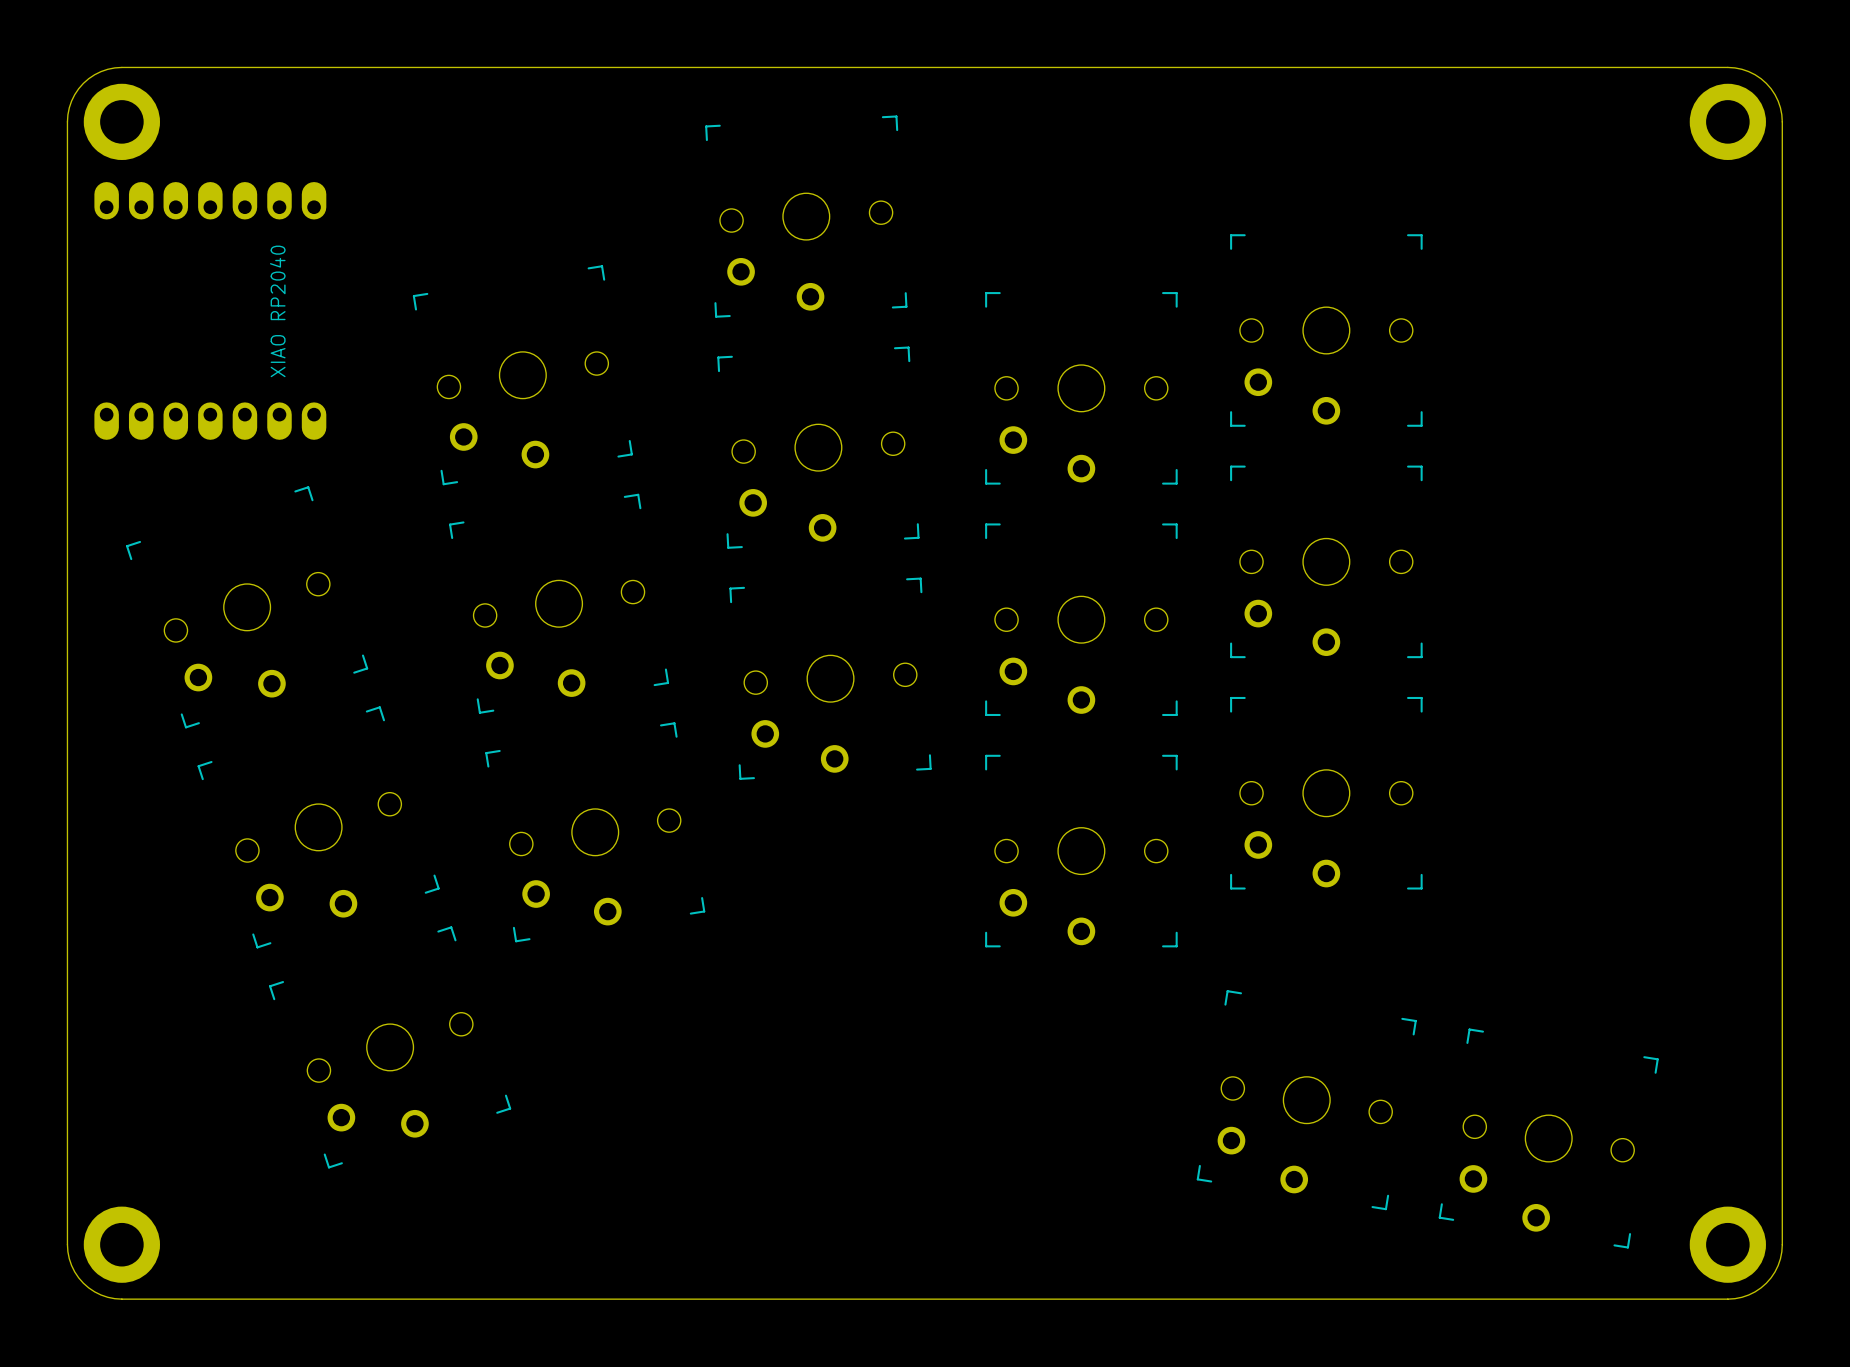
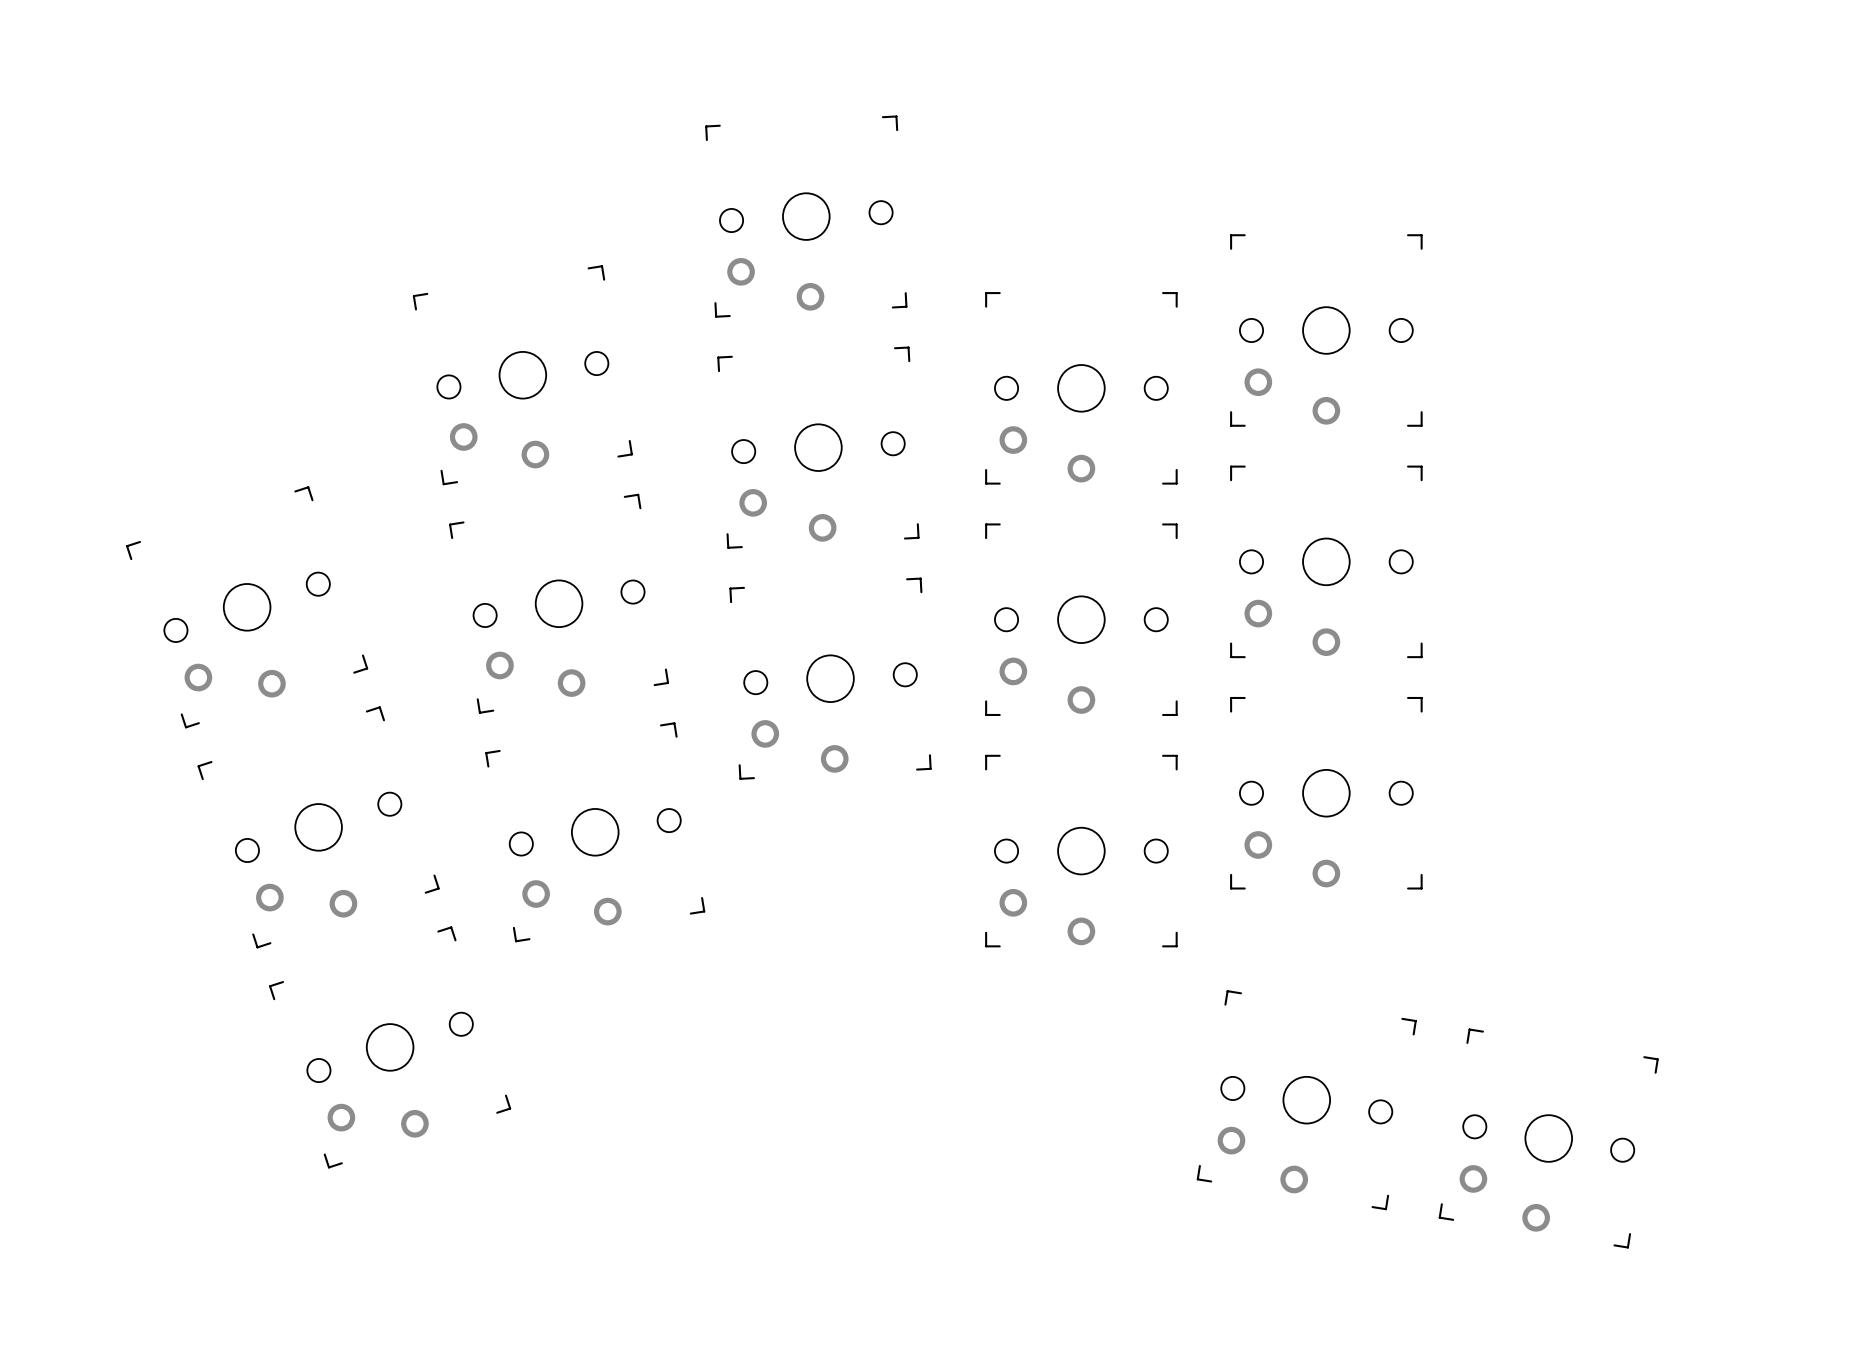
board edge: (121, 67) (1727, 67) (1741, 69) (1761, 78) (1771, 88) (1778, 101) (1782, 121) (1782, 1244) (1778, 1265) (1771, 1277) (1755, 1291) (1741, 1297) (1727, 1299) (121, 1299) (107, 1297) (88, 1287) (78, 1277) (71, 1265) (67, 1244) (67, 121) (71, 101) (83, 83) (101, 71) (121, 67) -> none
part: (121, 121) -> none
part: (1727, 121) -> none
part: (210, 310) -> none
part: (121, 1244) -> none
part: (1727, 1244) -> none

